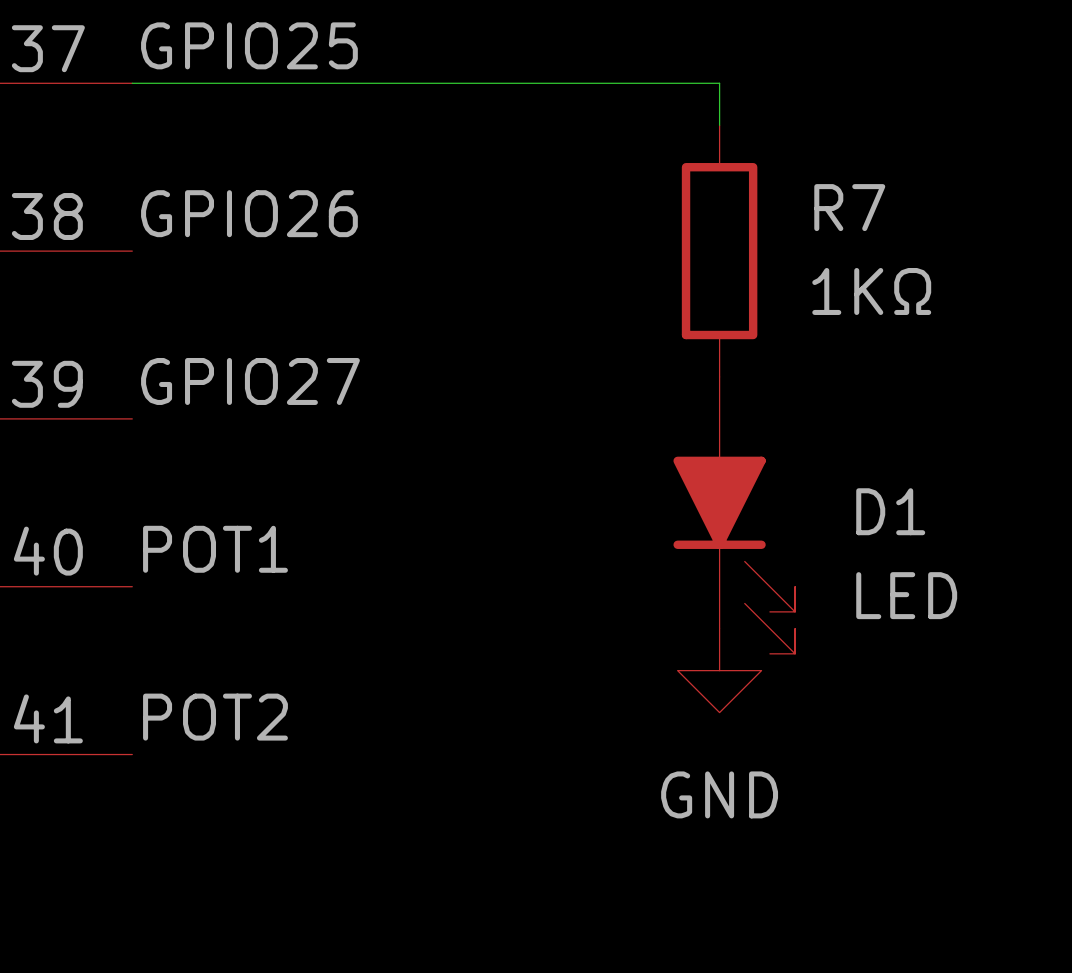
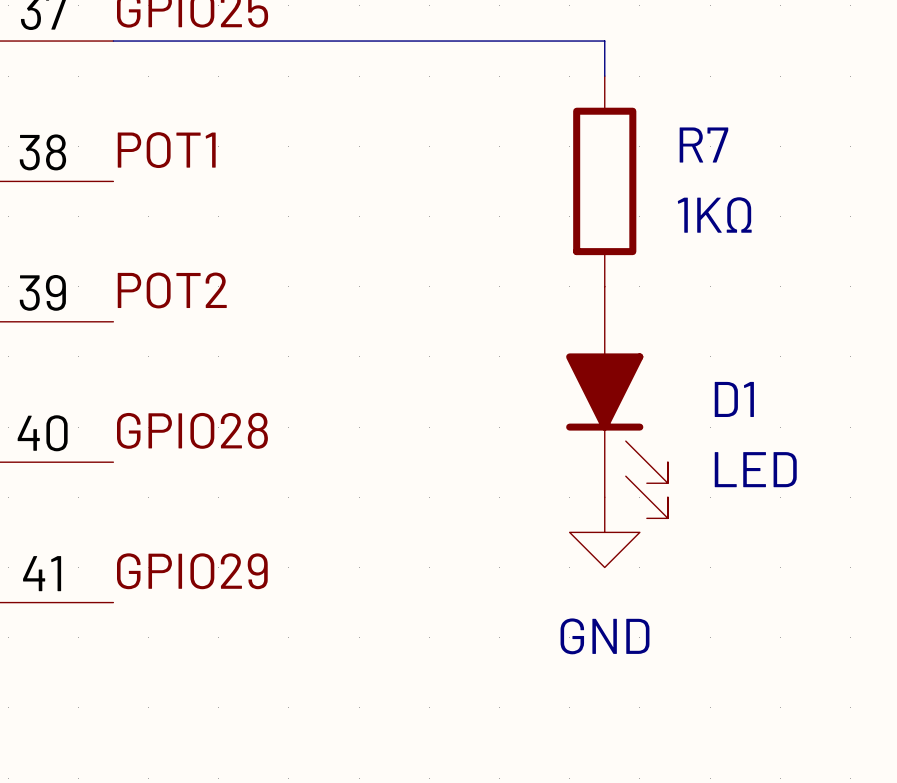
label: GPIO26 (249, 213) -> POT1 (166, 150)
label: GPIO27 (250, 381) -> POT2 (172, 290)
label: POT1 (215, 549) -> GPIO28 (192, 430)
label: POT2 (215, 717) -> GPIO29 (192, 571)

